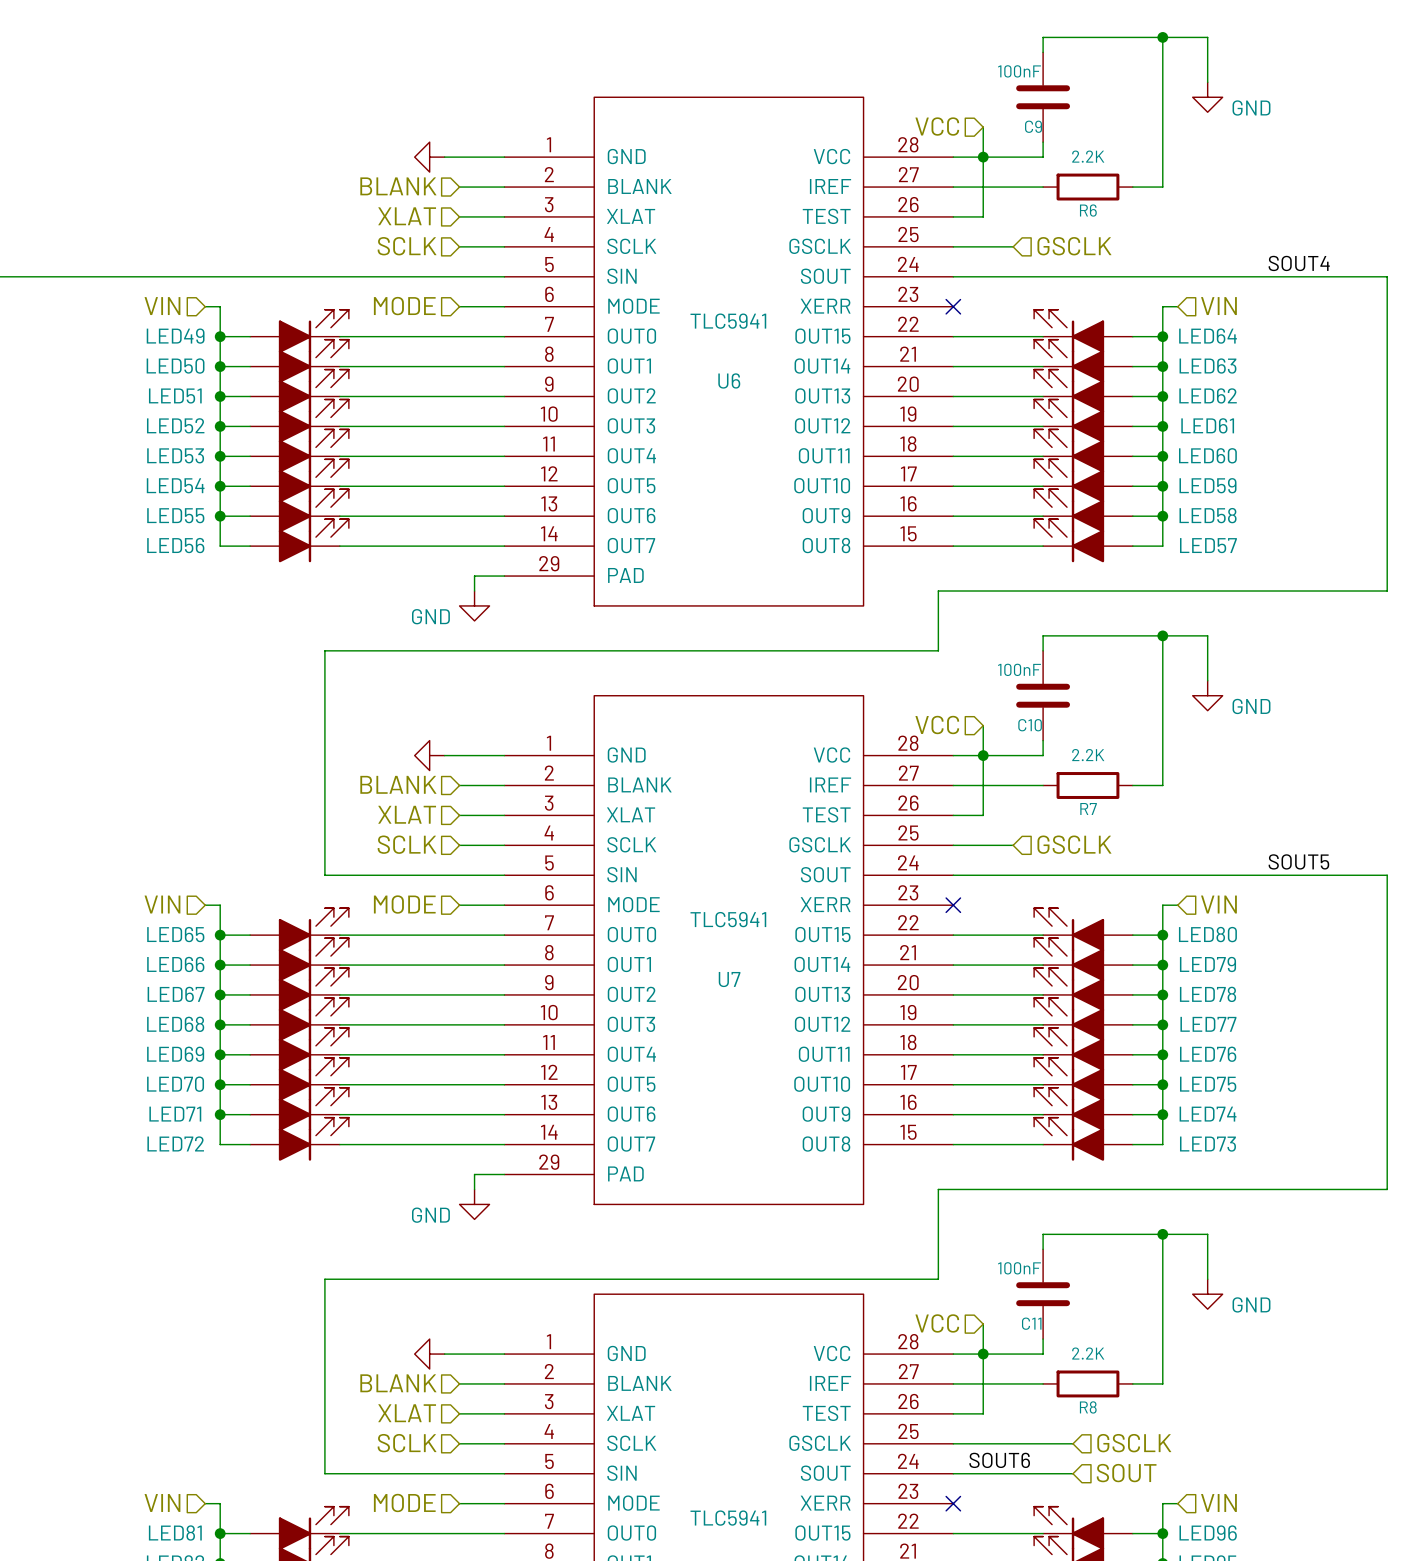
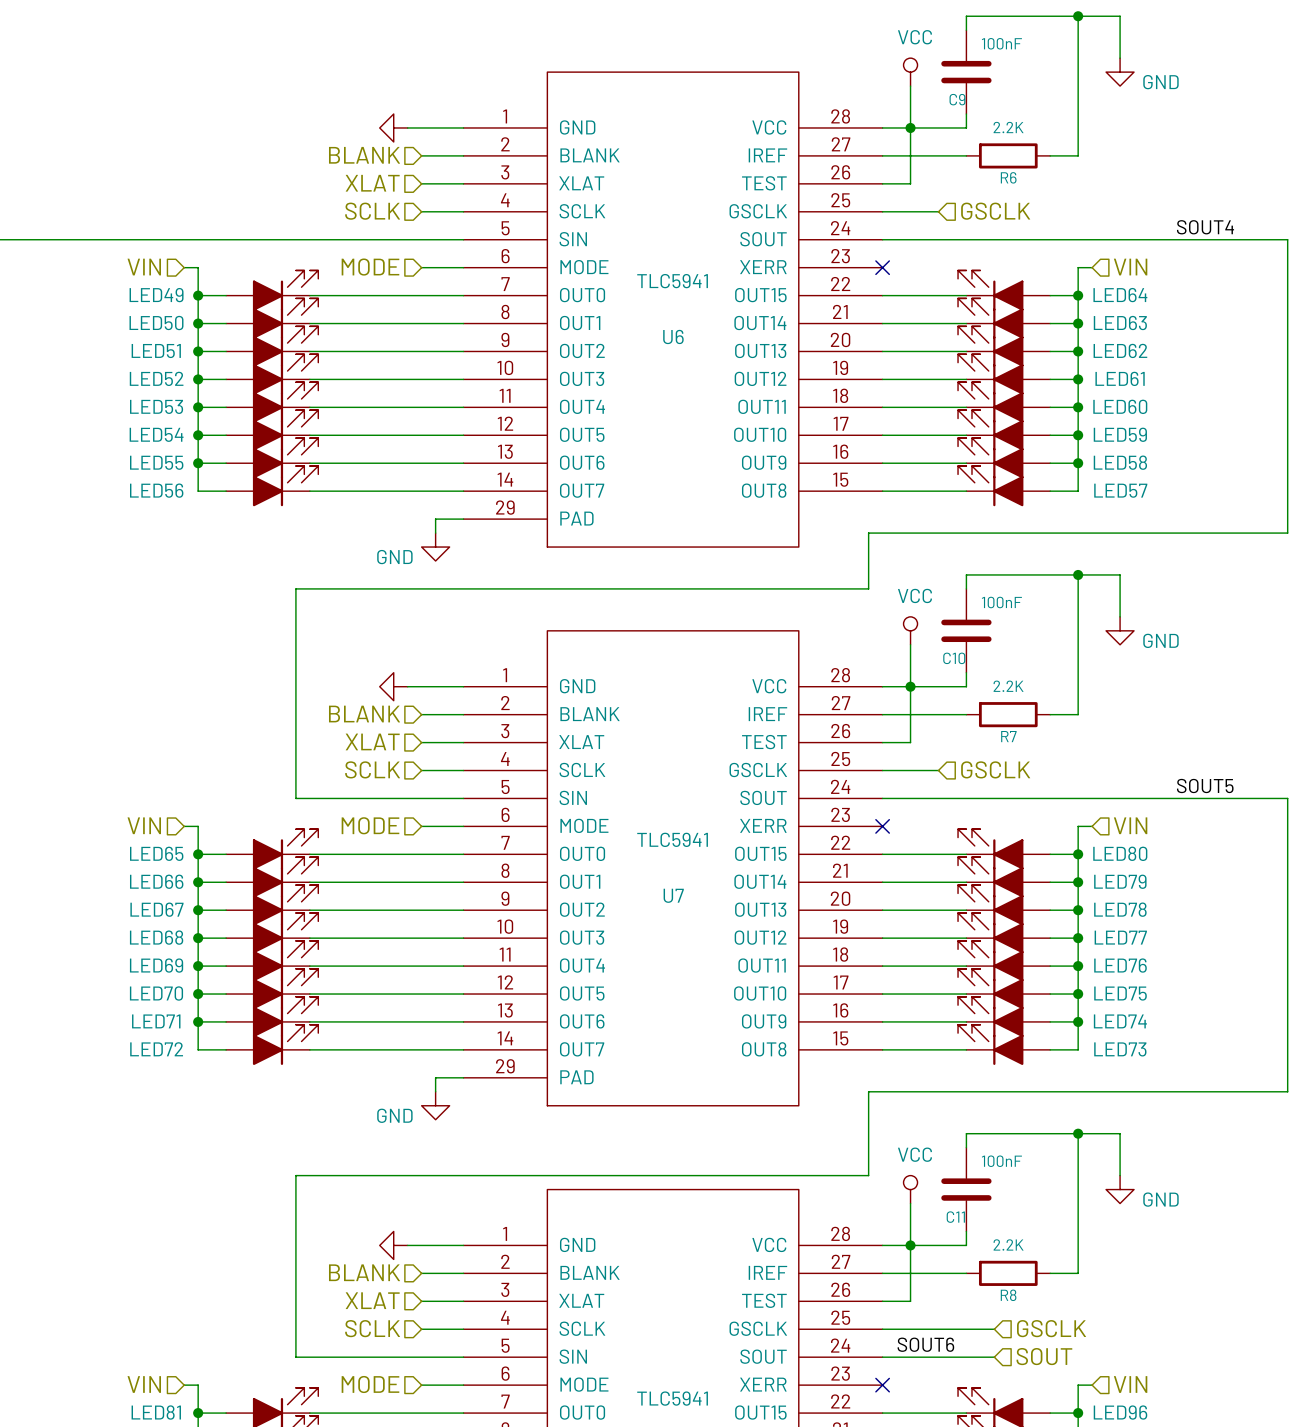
C9 value position: 100nF (1019, 71) -> 100nF (1001, 43)
power symbol: none -> VCC (910, 72)
wire: none -> (910, 86) (910, 100)
hierarchical label: VCC (937, 126) -> none
C10 value position: 100nF (1019, 669) -> 100nF (1001, 602)
power symbol: none -> VCC (910, 630)
wire: none -> (910, 644) (910, 658)
hierarchical label: VCC (937, 725) -> none
C11 value position: 100nF (1019, 1268) -> 100nF (1001, 1161)
power symbol: none -> VCC (910, 1189)
wire: none -> (910, 1203) (910, 1217)
hierarchical label: VCC (937, 1323) -> none

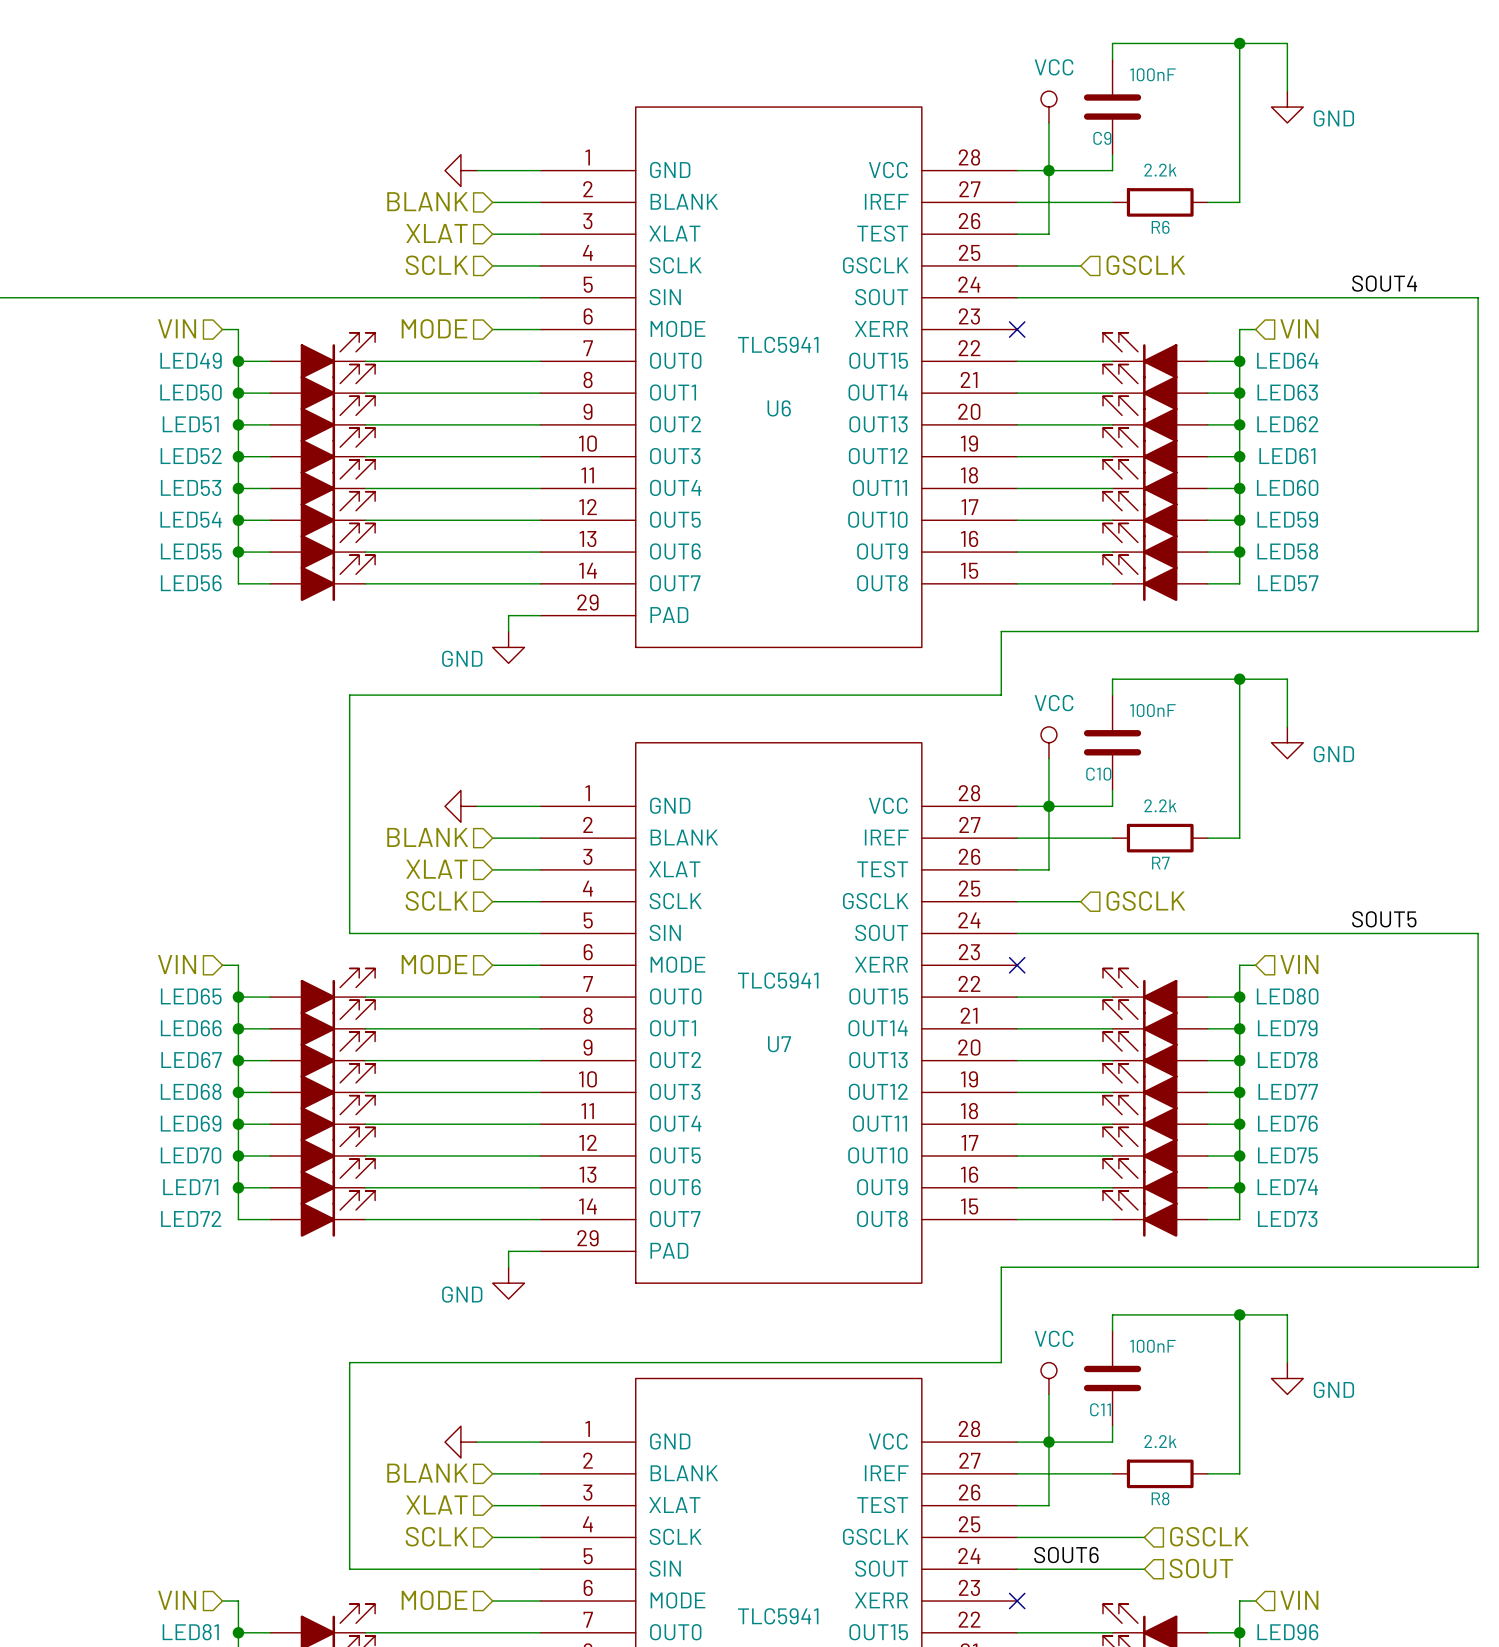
R6 value: 2.2K (1008, 127) -> 2.2k (1160, 170)
R7 value: 2.2K (1008, 686) -> 2.2k (1160, 805)
R8 value: 2.2K (1008, 1244) -> 2.2k (1160, 1441)

